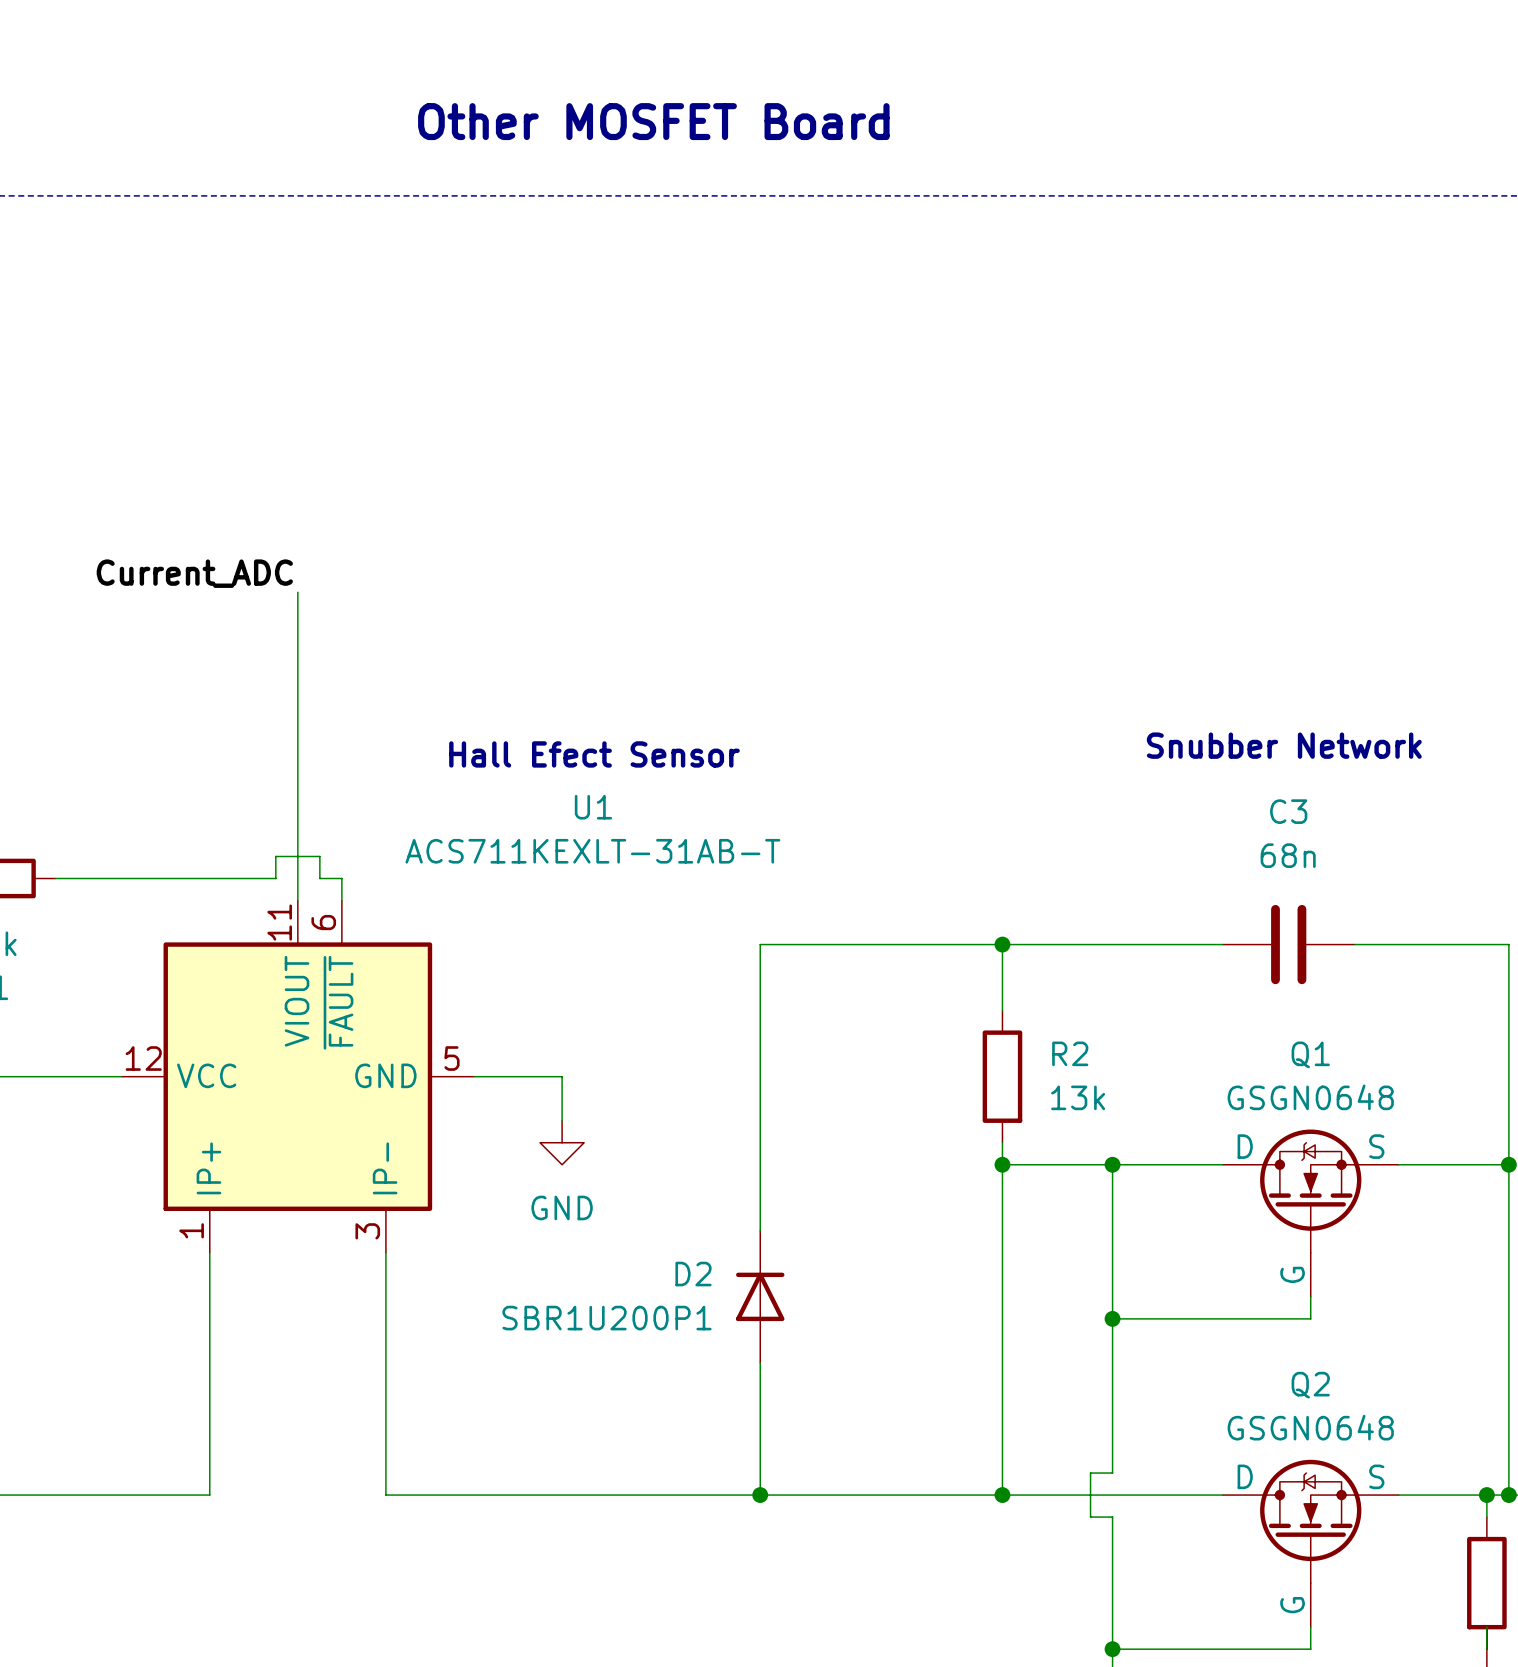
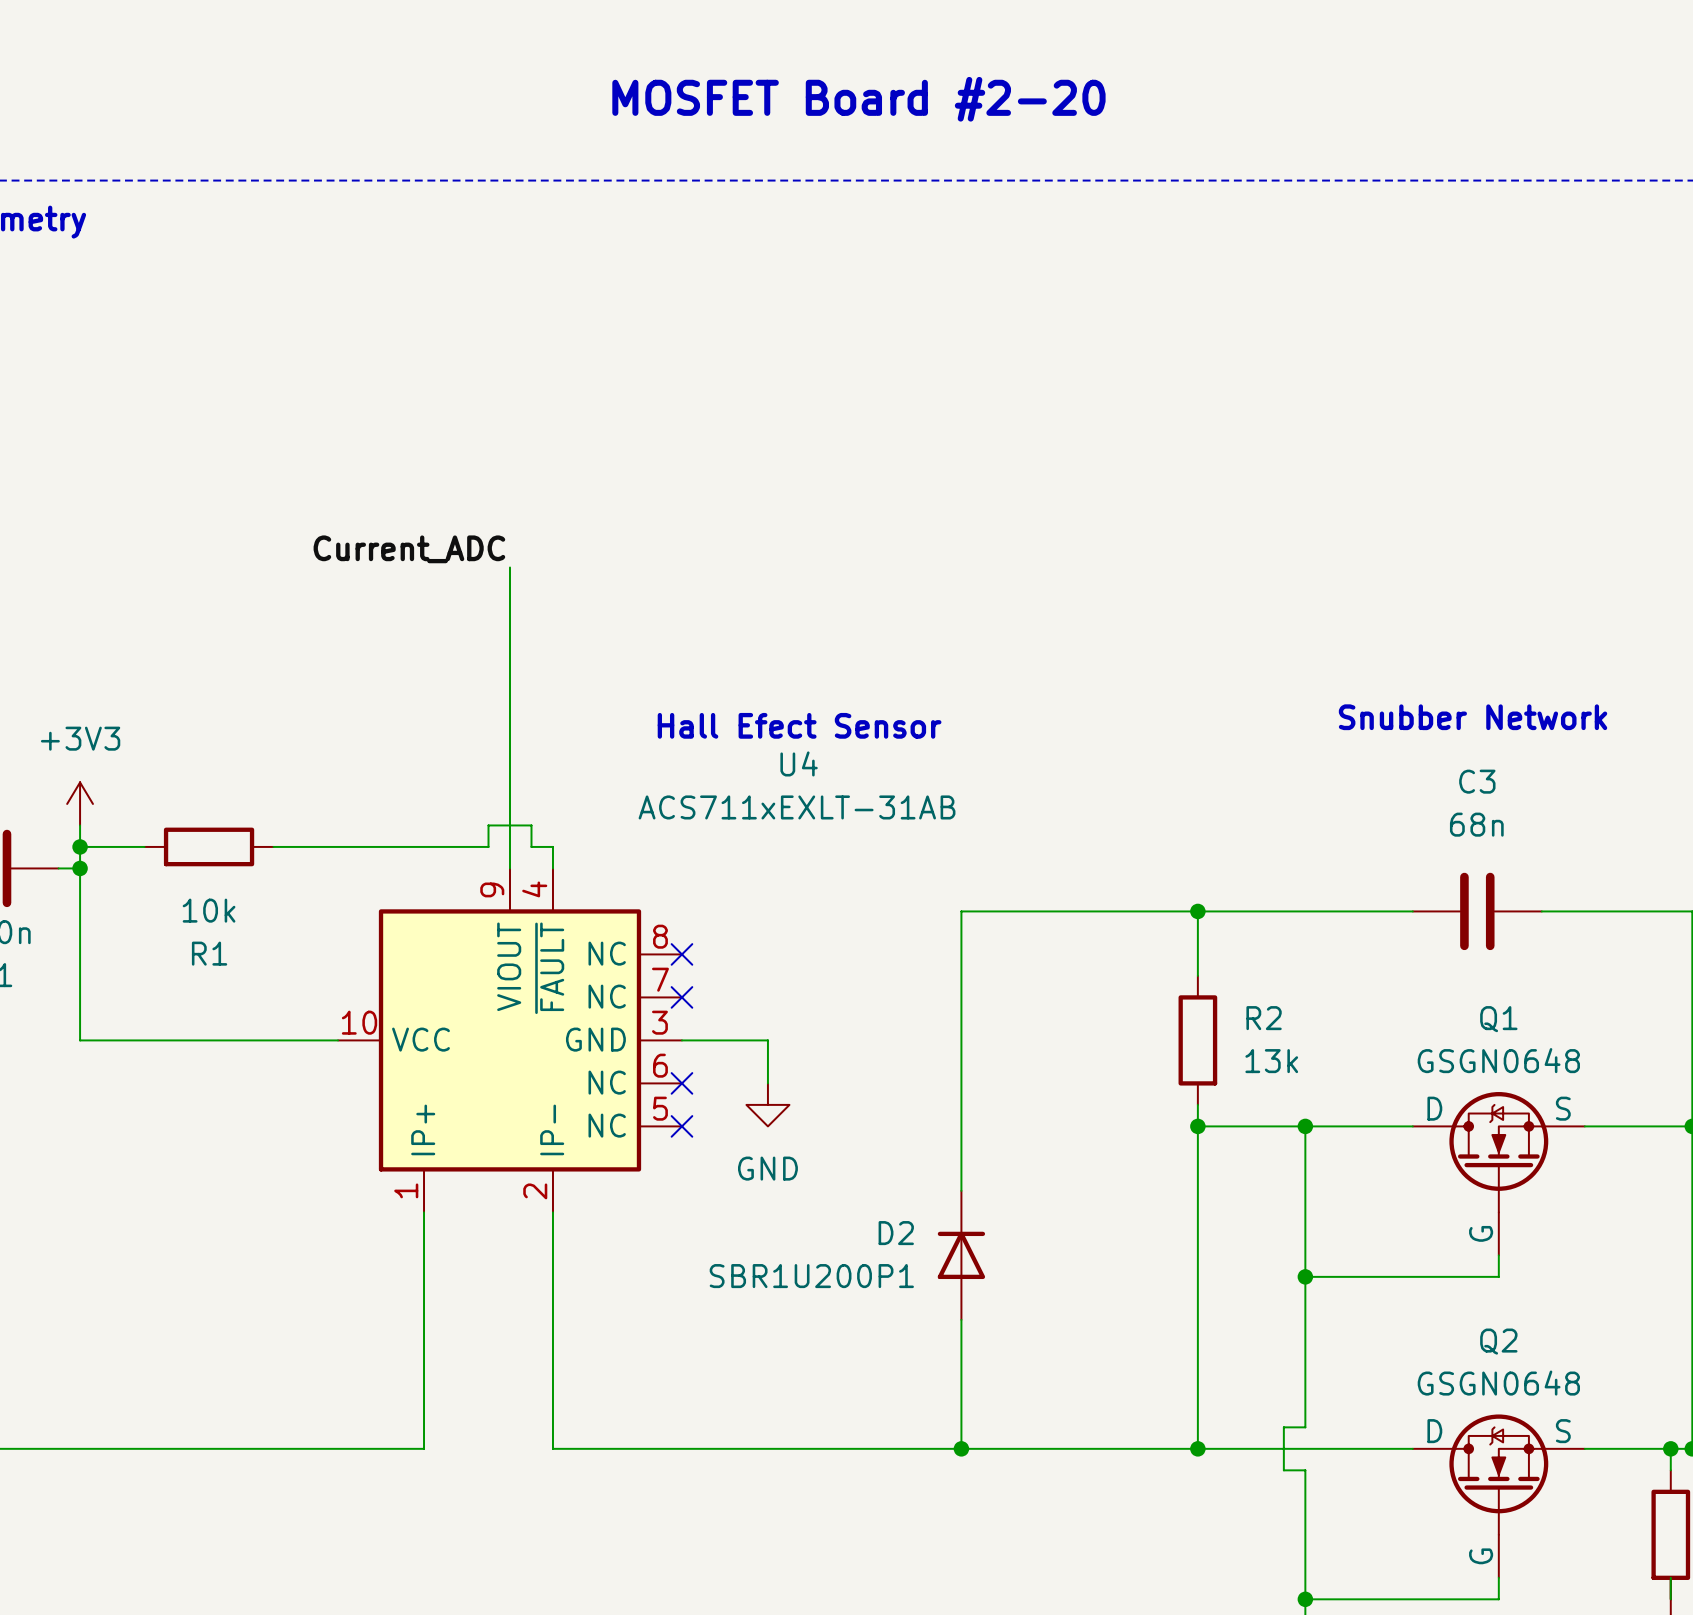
text: Other MOSFET Board (653, 121) -> MOSFET Board #2-20 (858, 99)
no-connect mark: none -> (681, 954)
no-connect mark: none -> (681, 997)
U1: ACS711KEXLT-31AB-T (297, 1076) -> none
U4: none -> ACS711xEXLT-31AB (509, 1040)
no-connect mark: none -> (681, 1083)
no-connect mark: none -> (681, 1126)
wire: (385, 1252) (385, 1495) -> (552, 1212) (552, 1448) (595, 1448)

